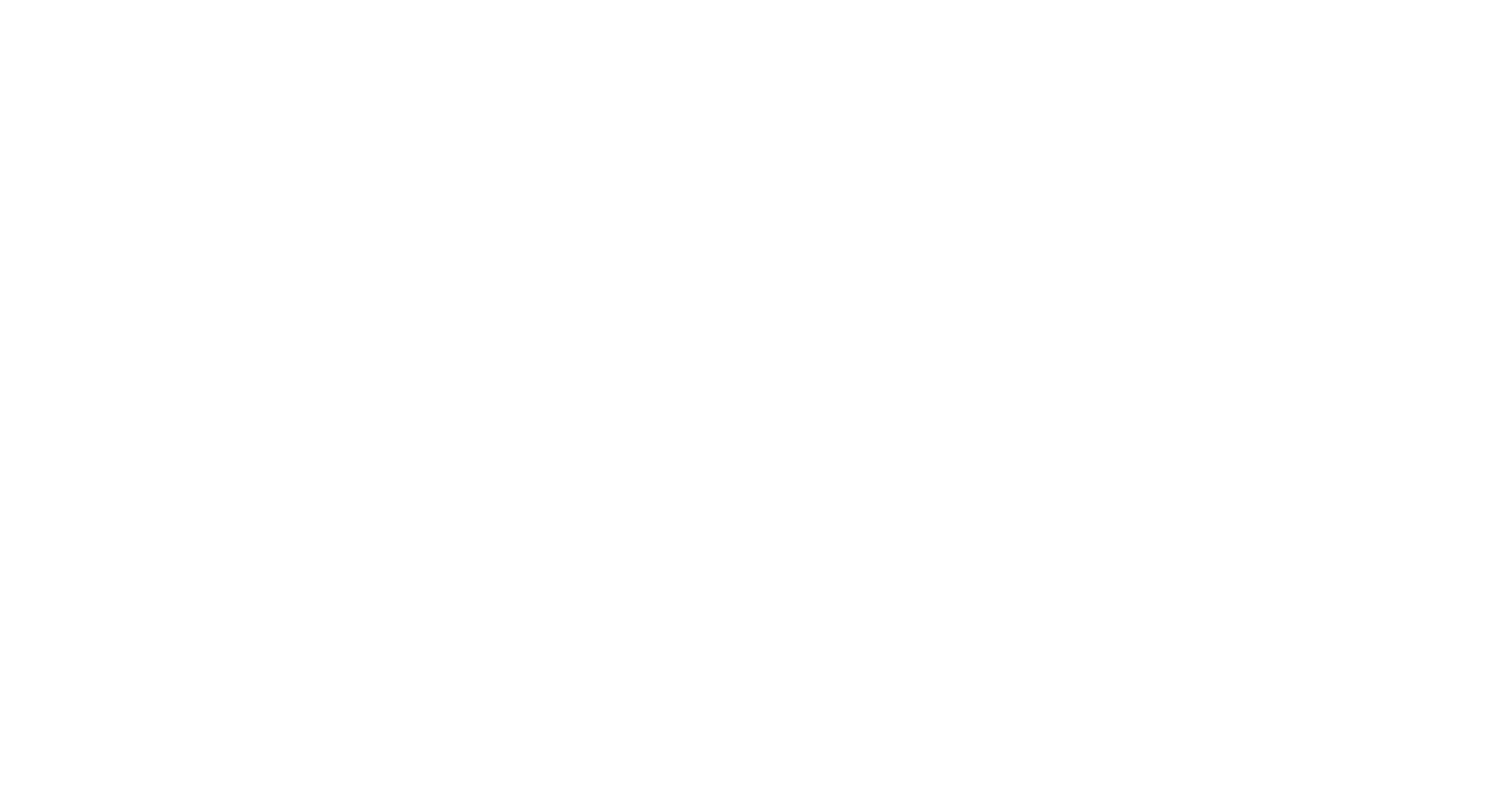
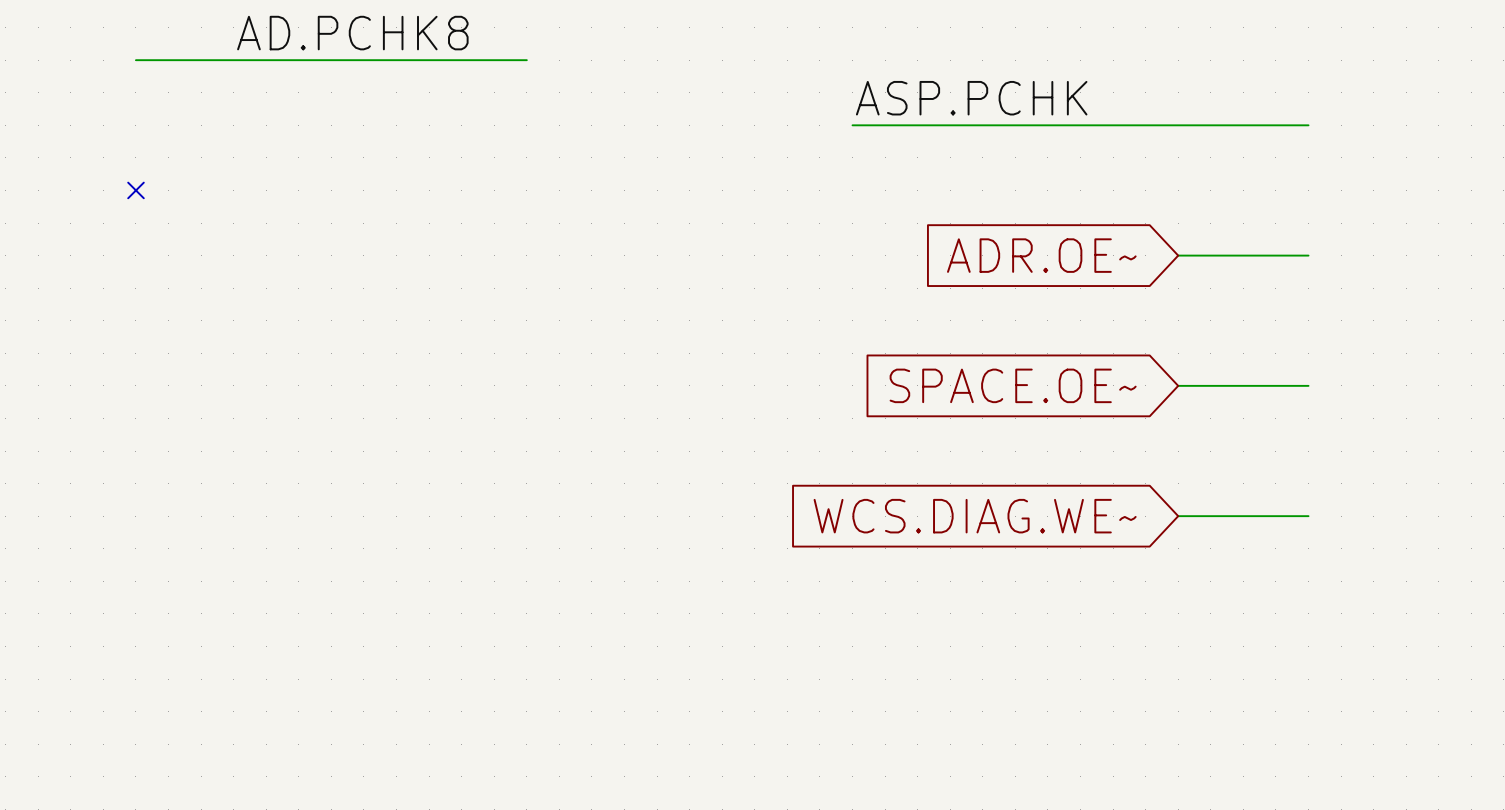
label: none -> AD.PCHK8 (352, 33)
wire: none -> (135, 60) (526, 60)
label: none -> ASP.PCHK (971, 98)
wire: none -> (852, 125) (1308, 125)
no-connect mark: none -> (135, 190)
global label: none -> ADR.OE~ (1041, 255)
wire: none -> (1178, 255) (1308, 255)
global label: none -> SPACE.OE~ (1013, 385)
wire: none -> (1178, 385) (1308, 385)
global label: none -> WCS.DIAG.WE~ (975, 516)
wire: none -> (1178, 516) (1308, 516)

